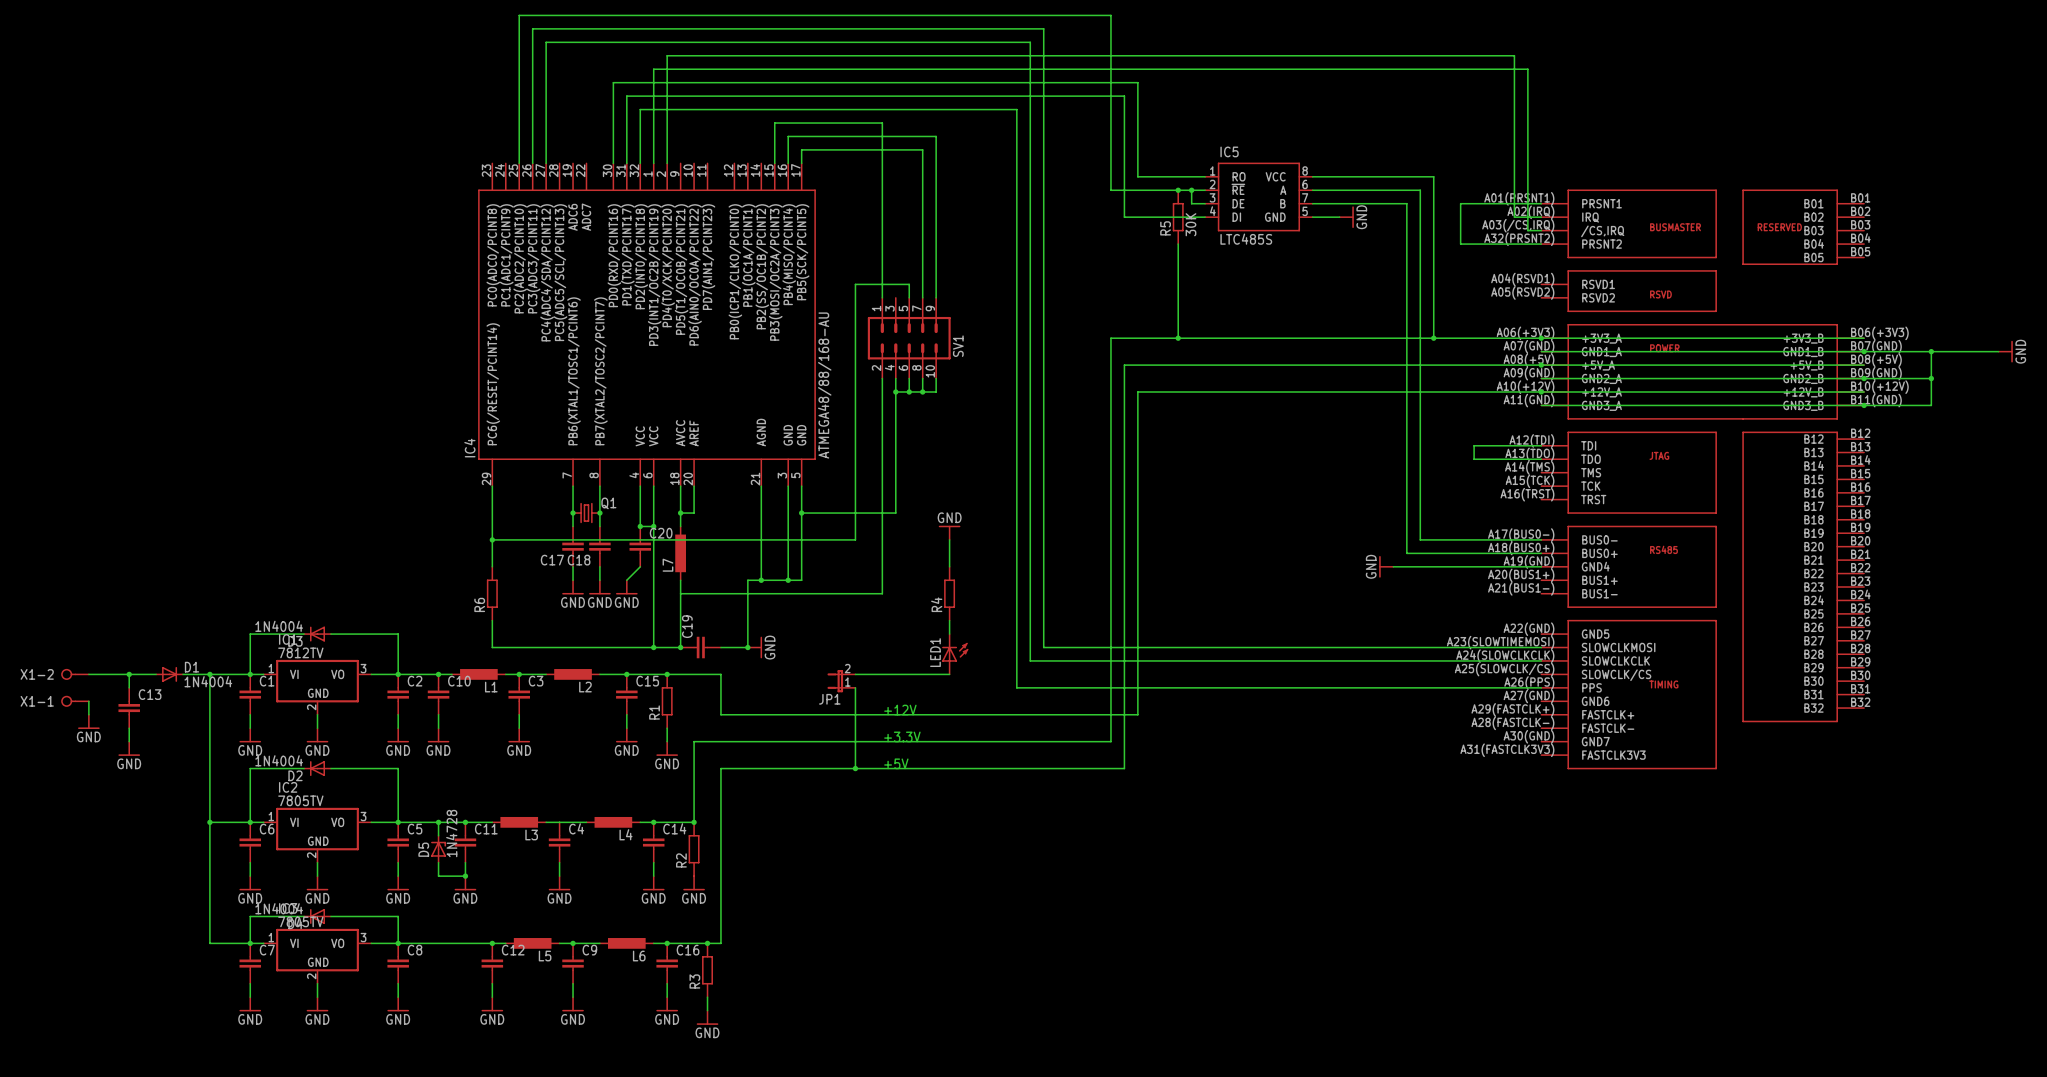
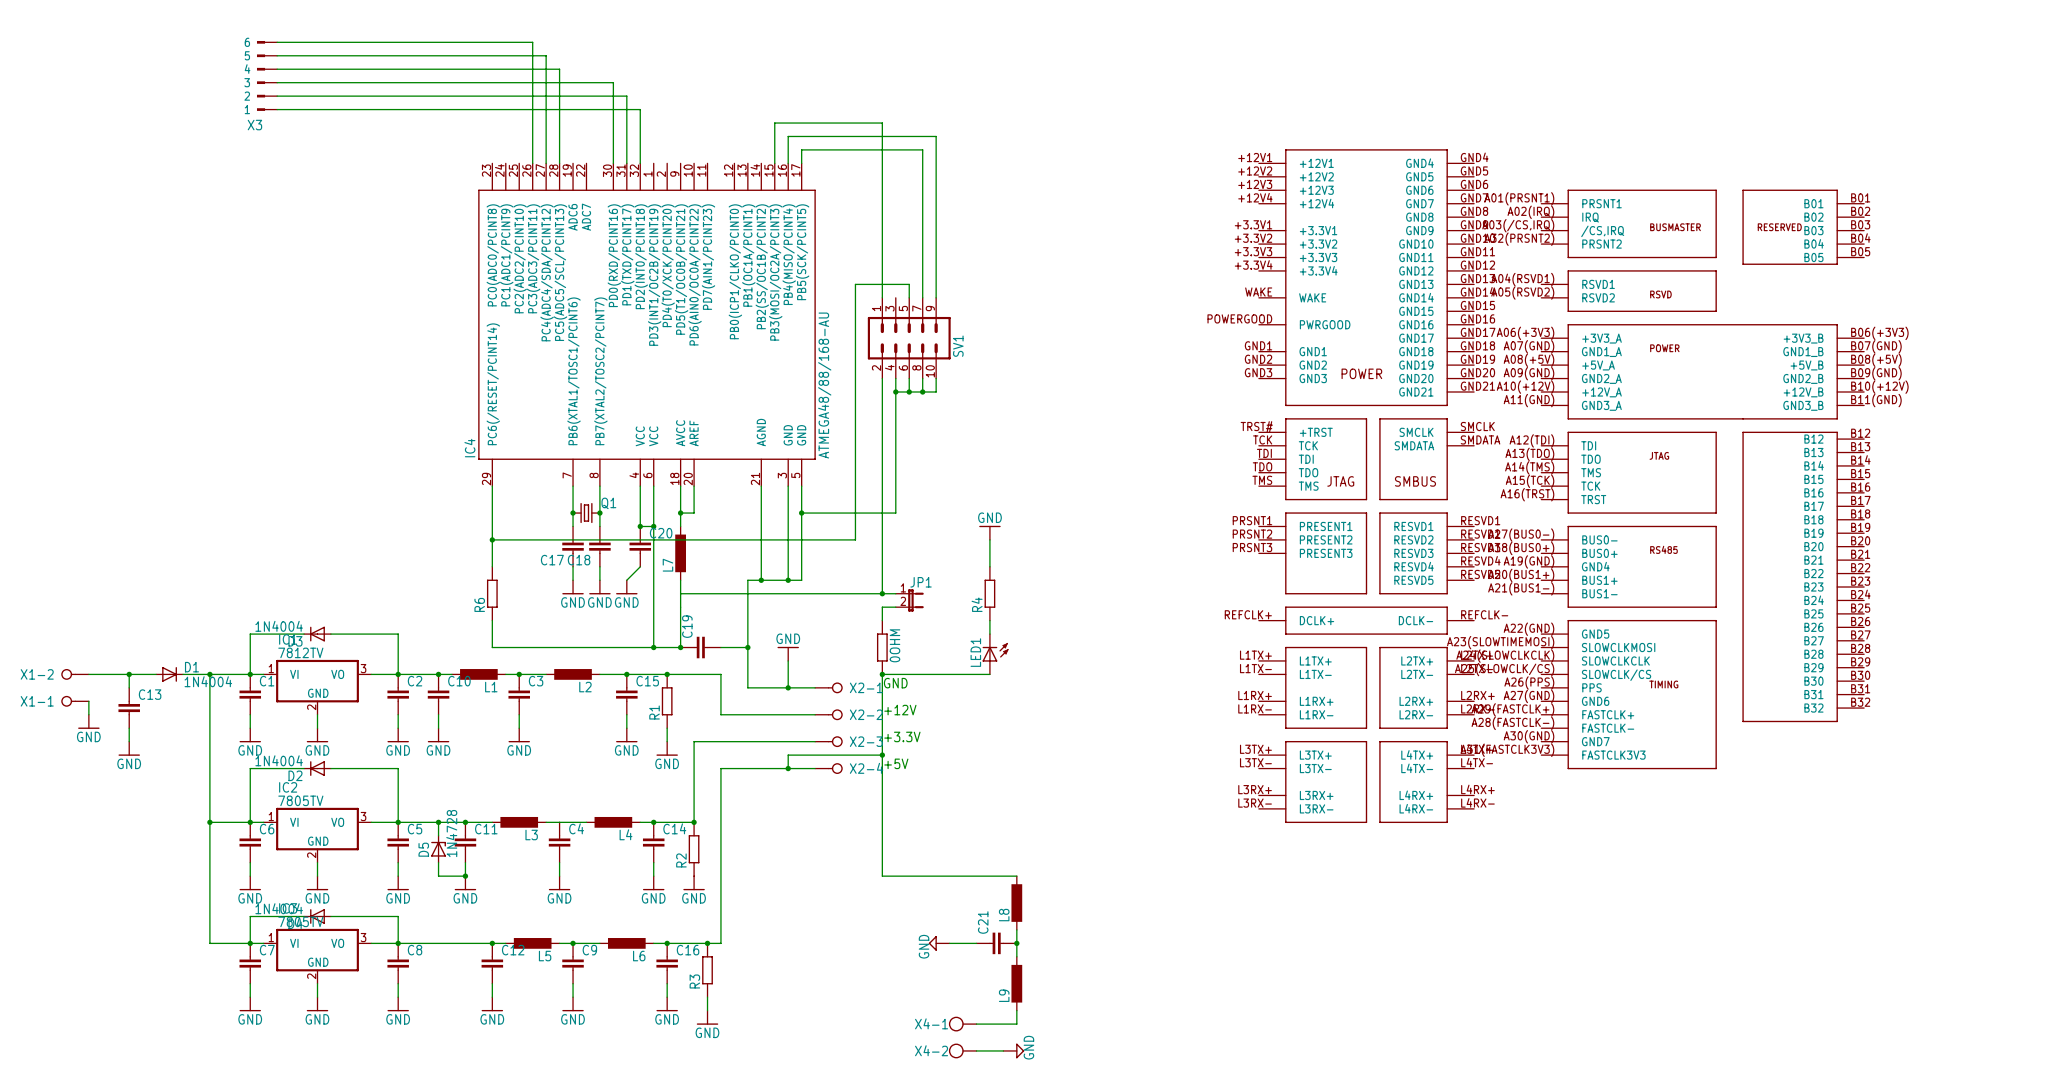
wire: (532, 42) (532, 28) (1043, 28) (1043, 647) (1541, 647) -> (532, 42) (277, 42)
wire: (546, 55) (546, 42) (1030, 42) (1030, 660) (1541, 660) -> (546, 55) (277, 55)
wire: none -> (277, 69) (559, 69) (559, 163)
X3: none -> (267, 75)
wire: (613, 82) (1137, 82) (1137, 176) (1205, 176) -> (613, 82) (277, 82)
wire: (626, 96) (1124, 96) (1124, 217) (1205, 217) -> (626, 96) (277, 96)
wire: (640, 109) (1016, 109) (1016, 687) (1541, 687) -> (640, 109) (277, 109)
wire: (519, 163) (519, 15) (1110, 15) (1110, 190) (1205, 190) -> none
wire: (653, 163) (653, 69) (1527, 69) (1527, 230) (1541, 230) -> none
wire: (667, 163) (667, 55) (1514, 55) (1514, 217) (1541, 217) -> none
wire: (1312, 176) (1433, 176) (1433, 338) -> none
junction: (1178, 190) -> none
wire: (1191, 190) (1191, 203) (1205, 203) -> none
junction: (1191, 190) -> none
wire: (1312, 190) (1420, 190) (1420, 539) (1541, 539) -> none
IC5: LTC485S (1258, 196) -> none
wire: (1312, 203) (1406, 203) (1406, 553) (1541, 553) -> none
wire: (1541, 203) (1460, 203) (1460, 244) (1541, 244) -> none
R5: 30K (1178, 217) -> none
wire: (1312, 217) (1339, 217) -> none
power symbol: GND (1346, 217) -> none
wire: (1178, 244) (1178, 338) -> none
junction: (1178, 338) -> none
junction: (1433, 338) -> none
junction: (1541, 338) -> none
wire: (1864, 338) (1110, 338) (1110, 741) (815, 741) -> none
wire: (1541, 351) (1998, 351) -> none
junction: (1864, 351) -> none
wire: (1931, 351) (1931, 405) (1541, 405) -> none
junction: (1931, 351) -> none
power symbol: GND (2005, 351) -> none
junction: (1541, 365) -> none
wire: (1864, 365) (1124, 365) (1124, 768) (815, 768) -> none
wire: (1541, 378) (1931, 378) -> none
junction: (1864, 378) -> none
junction: (1931, 378) -> none
junction: (1541, 391) -> none
wire: (1864, 391) (1137, 391) (1137, 714) (815, 714) -> none
junction: (1864, 405) -> none
wire: (1541, 445) (1474, 445) (1474, 459) (1541, 459) -> none
part: none -> (1366, 486)
power symbol position: GND (949, 532) -> GND (989, 532)
wire: (949, 539) (949, 566) -> (989, 539) (989, 566)
power symbol: GND (1386, 566) -> none
wire: (1393, 566) (1541, 566) -> none
wire: none -> (882, 593) (895, 593)
junction: none -> (882, 593)
R4 position: (949, 593) -> (989, 593)
wire: none -> (895, 607) (882, 607) (882, 620)
wire: (949, 620) (949, 634) -> (989, 620) (989, 634)
wire: none -> (747, 647) (747, 687) (815, 687)
power symbol position: GND (754, 647) -> GND (788, 653)
power symbol rotation: 0° (761, 647) -> 90° counterclockwise (788, 647)
0OHM: none -> (882, 647)
LED1 position: (955, 654) -> (995, 654)
wire: none -> (788, 660) (788, 687)
wire: (855, 674) (882, 674) -> (1016, 876) (882, 876) (882, 674)
junction: none -> (882, 674)
wire: none -> (949, 674) (989, 674)
JP1 rotation: 0° (835, 681) -> 180° (915, 600)
JP1 position: (841, 681) -> (909, 600)
text: none -> GND (895, 683)
junction: none -> (788, 687)
X2-1: none -> (828, 687)
wire: (855, 687) (855, 768) -> none
X2-2: none -> (828, 714)
X2-3: none -> (828, 741)
wire: none -> (882, 755) (788, 755) (788, 768)
junction: none -> (788, 768)
X2-4: none -> (828, 768)
junction position: (855, 768) -> (882, 755)
L8: none -> (1016, 903)
wire: none -> (1016, 929) (1016, 956)
power symbol: none -> GND (939, 943)
wire: none -> (949, 943) (976, 943)
C21: none -> (996, 943)
junction: none -> (1016, 943)
L9: none -> (1016, 983)
wire: none -> (1016, 1010) (1016, 1024) (976, 1024)
X4-1: none -> (962, 1024)
X4-2: none -> (962, 1050)
wire: none -> (976, 1050) (1003, 1050)
power symbol: none -> GND (1013, 1050)

